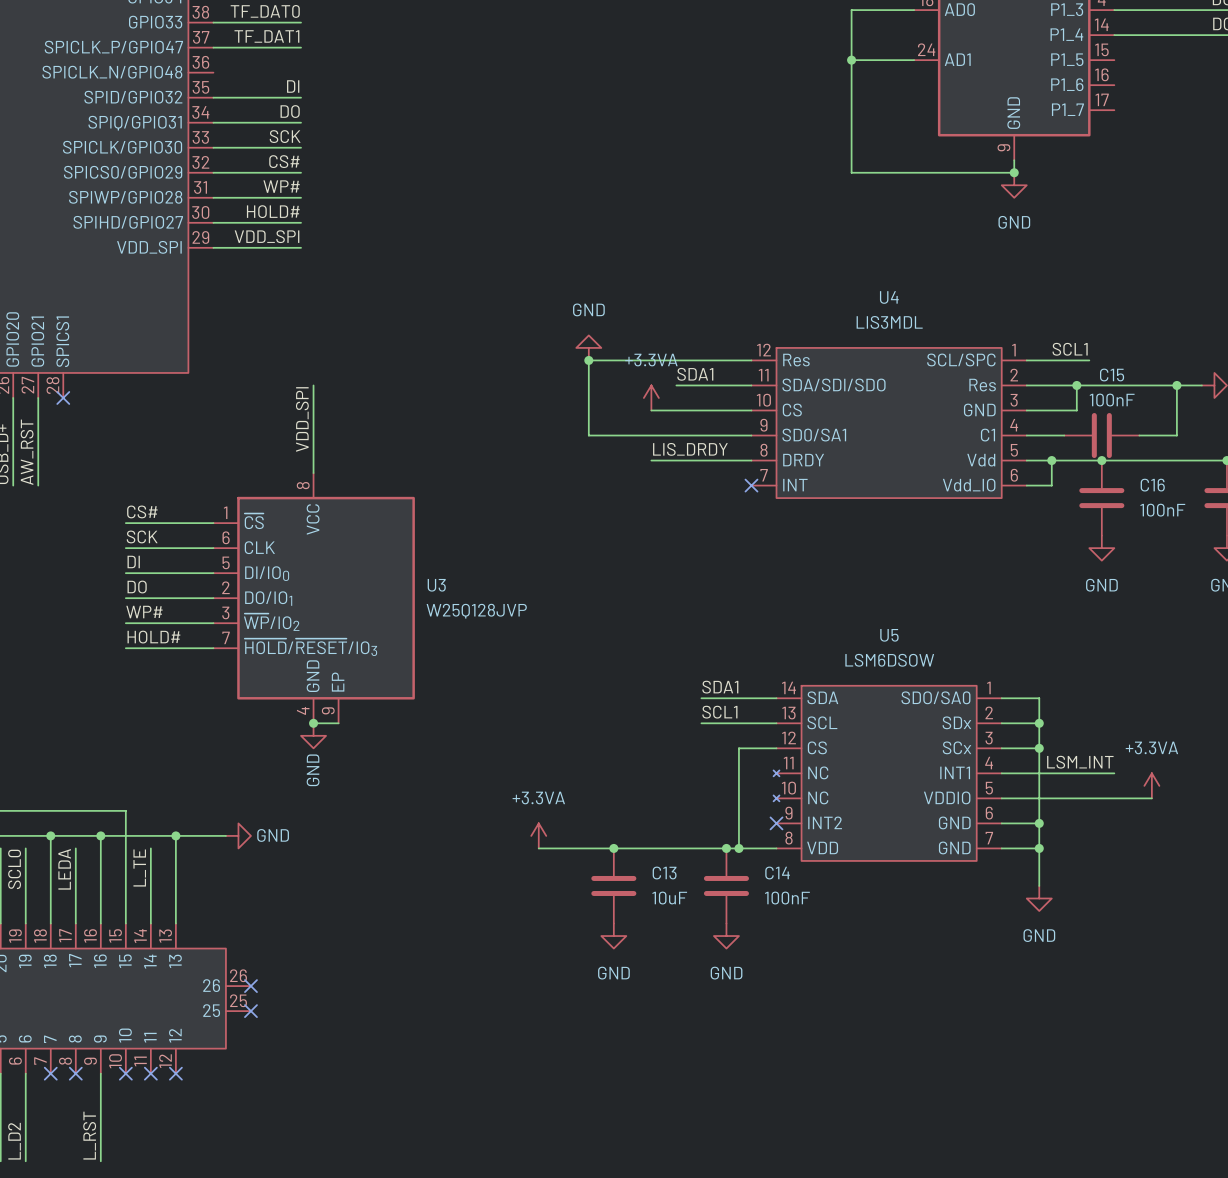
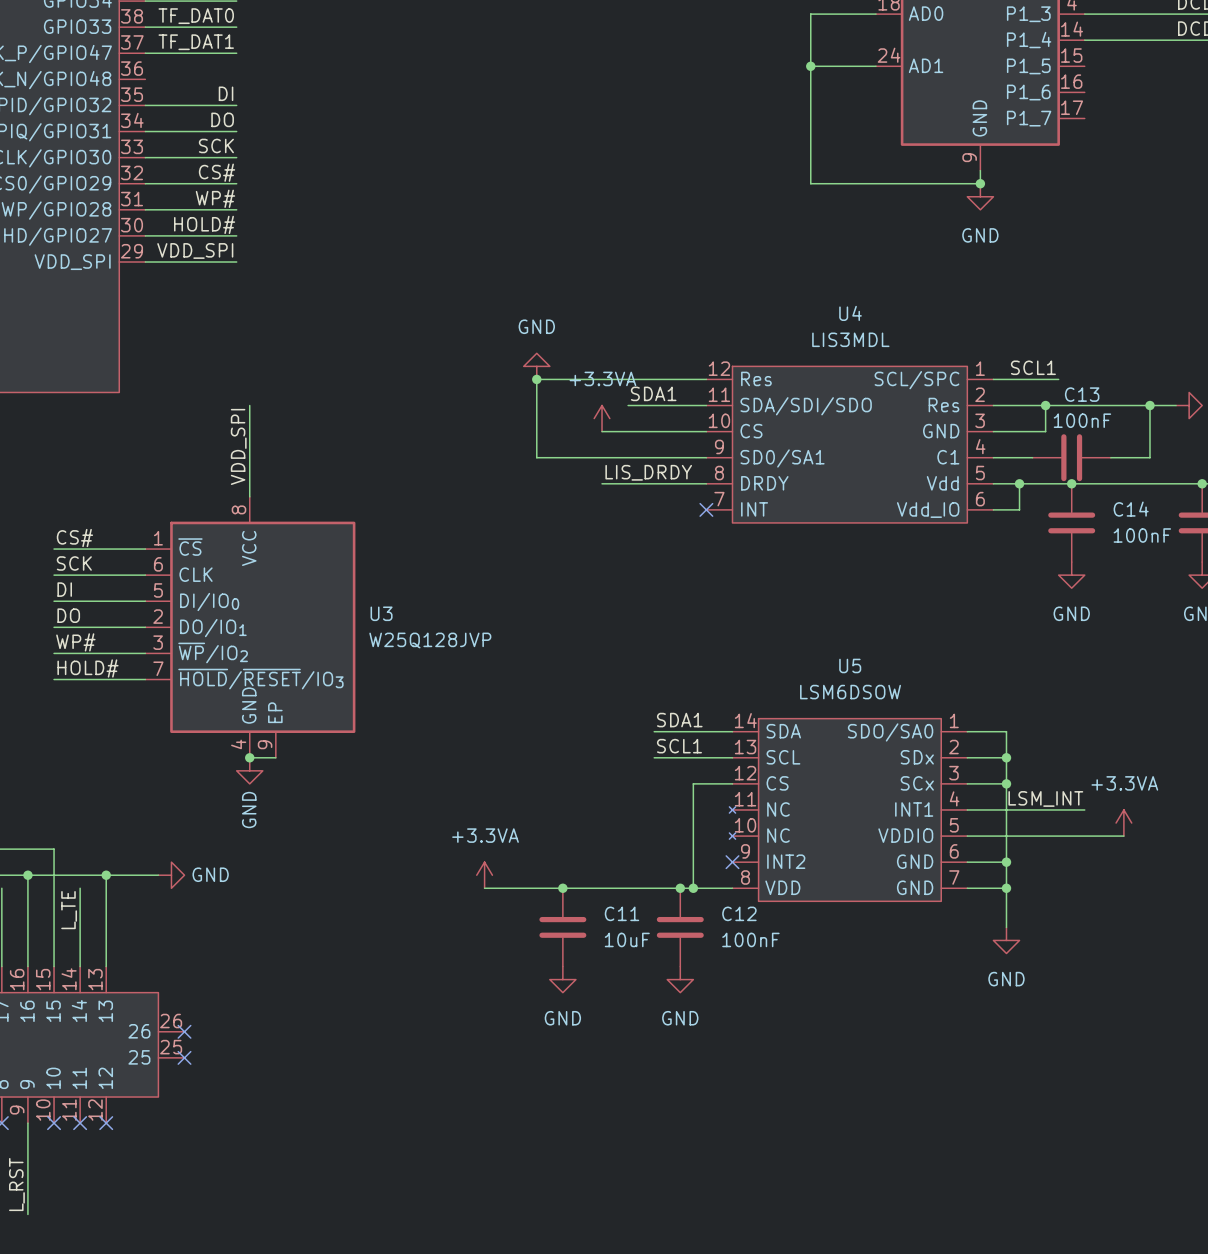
C15 name: C15 (1112, 375) -> C13 (1082, 394)
C16 name: C16 (1152, 485) -> C14 (1131, 509)
C13 name: C13 (664, 873) -> C11 (621, 913)
C14 name: C14 (777, 873) -> C12 (739, 913)

